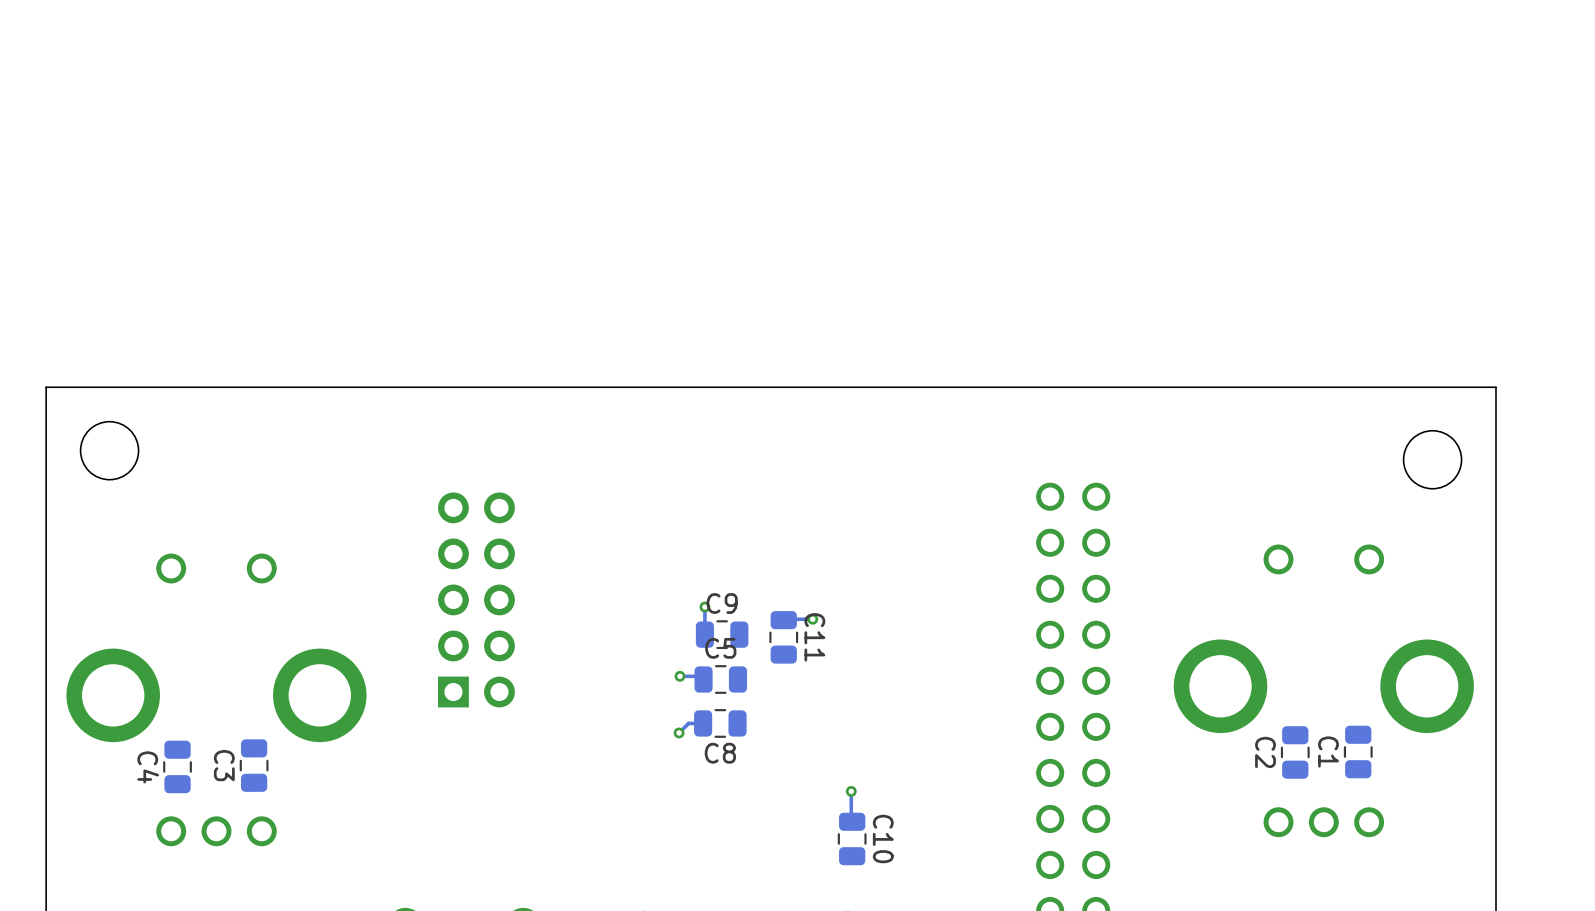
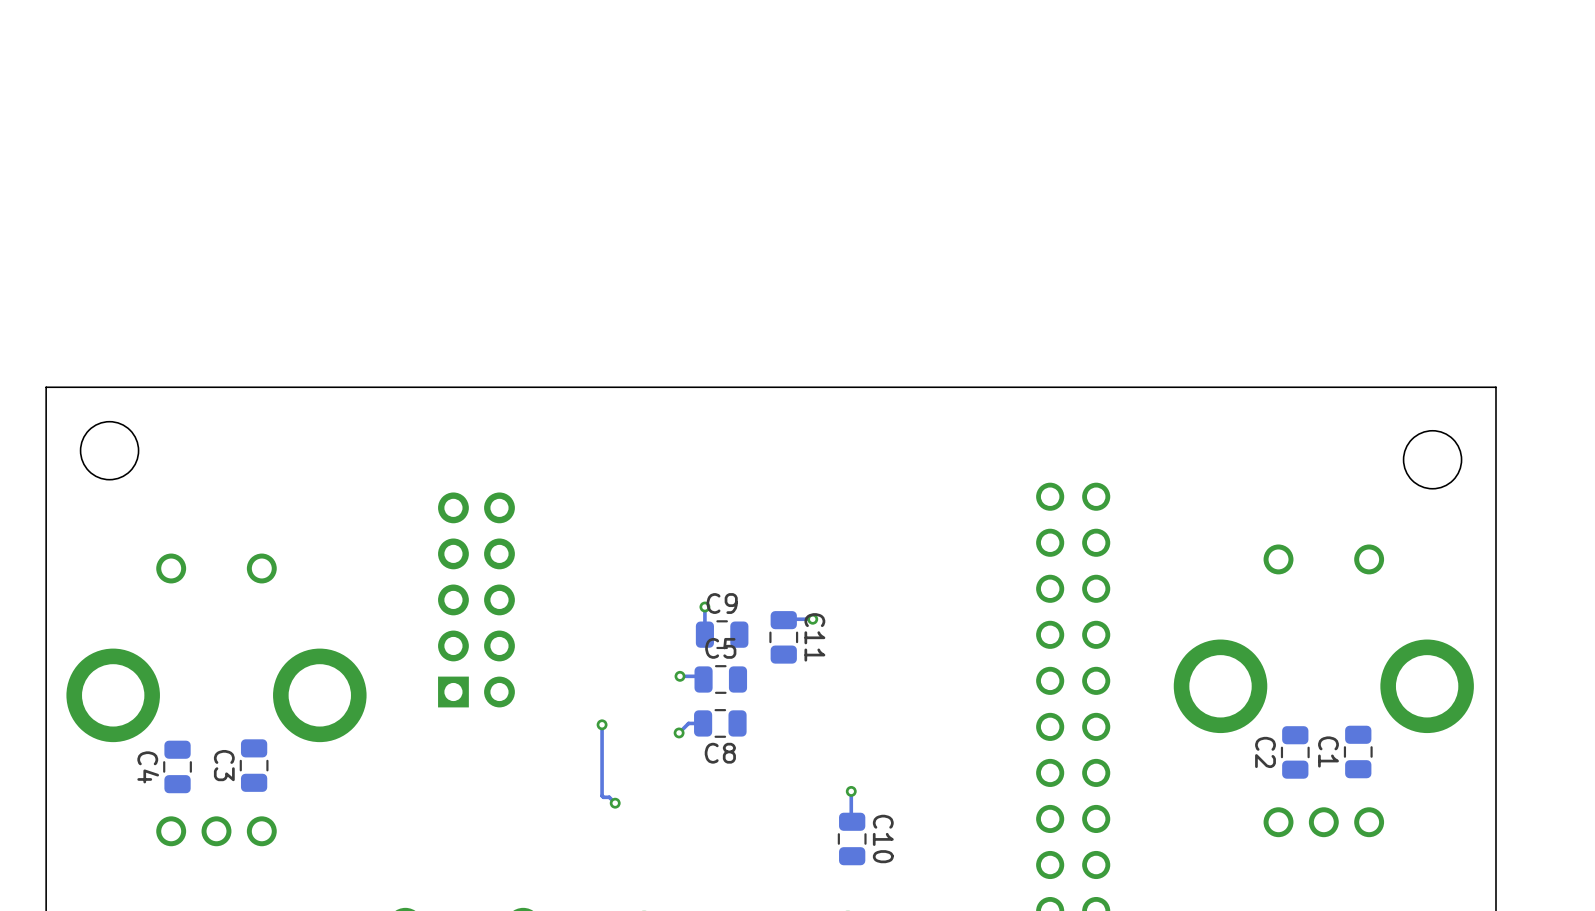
track: none -> (602, 724) (602, 795) (609, 797) (615, 803)
via: none -> (602, 724)
via: none -> (615, 803)

